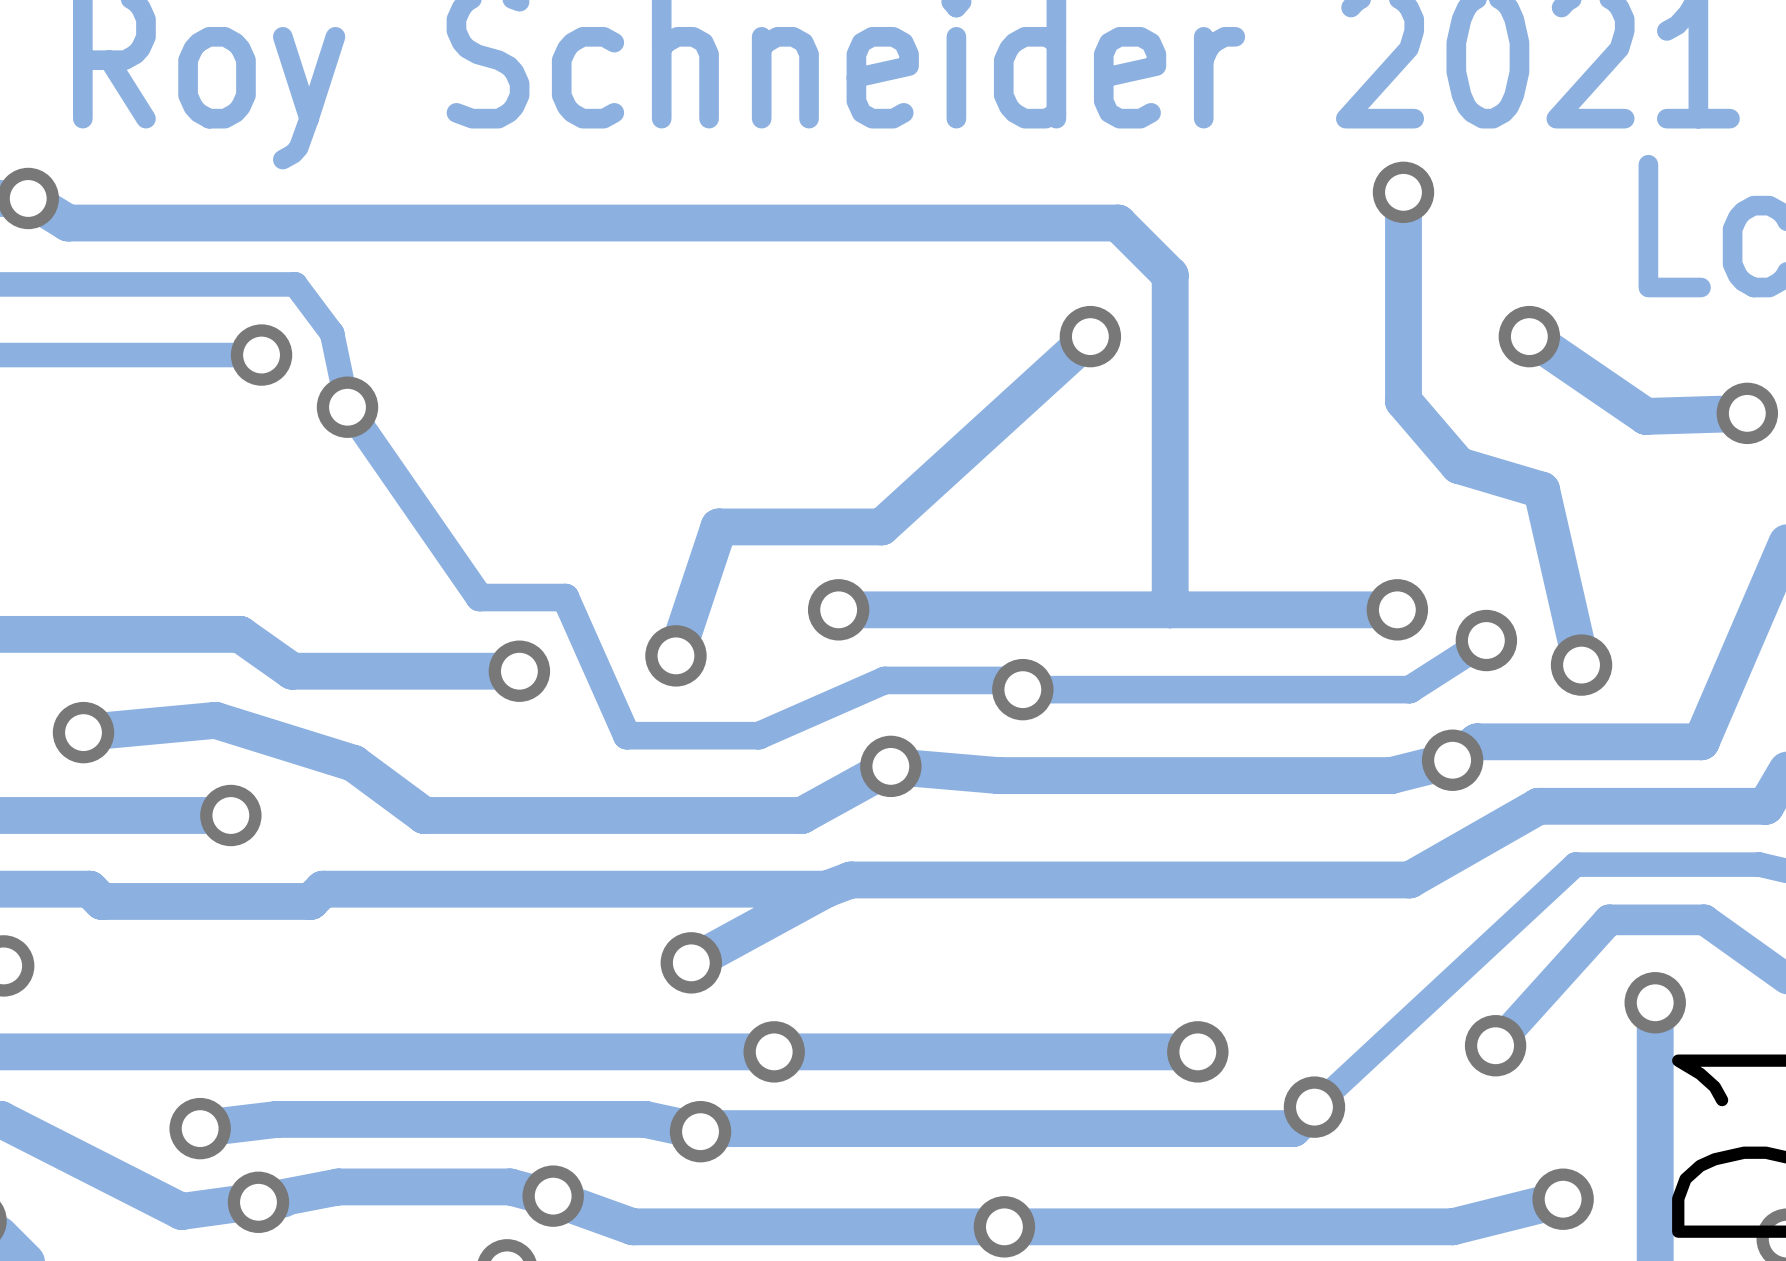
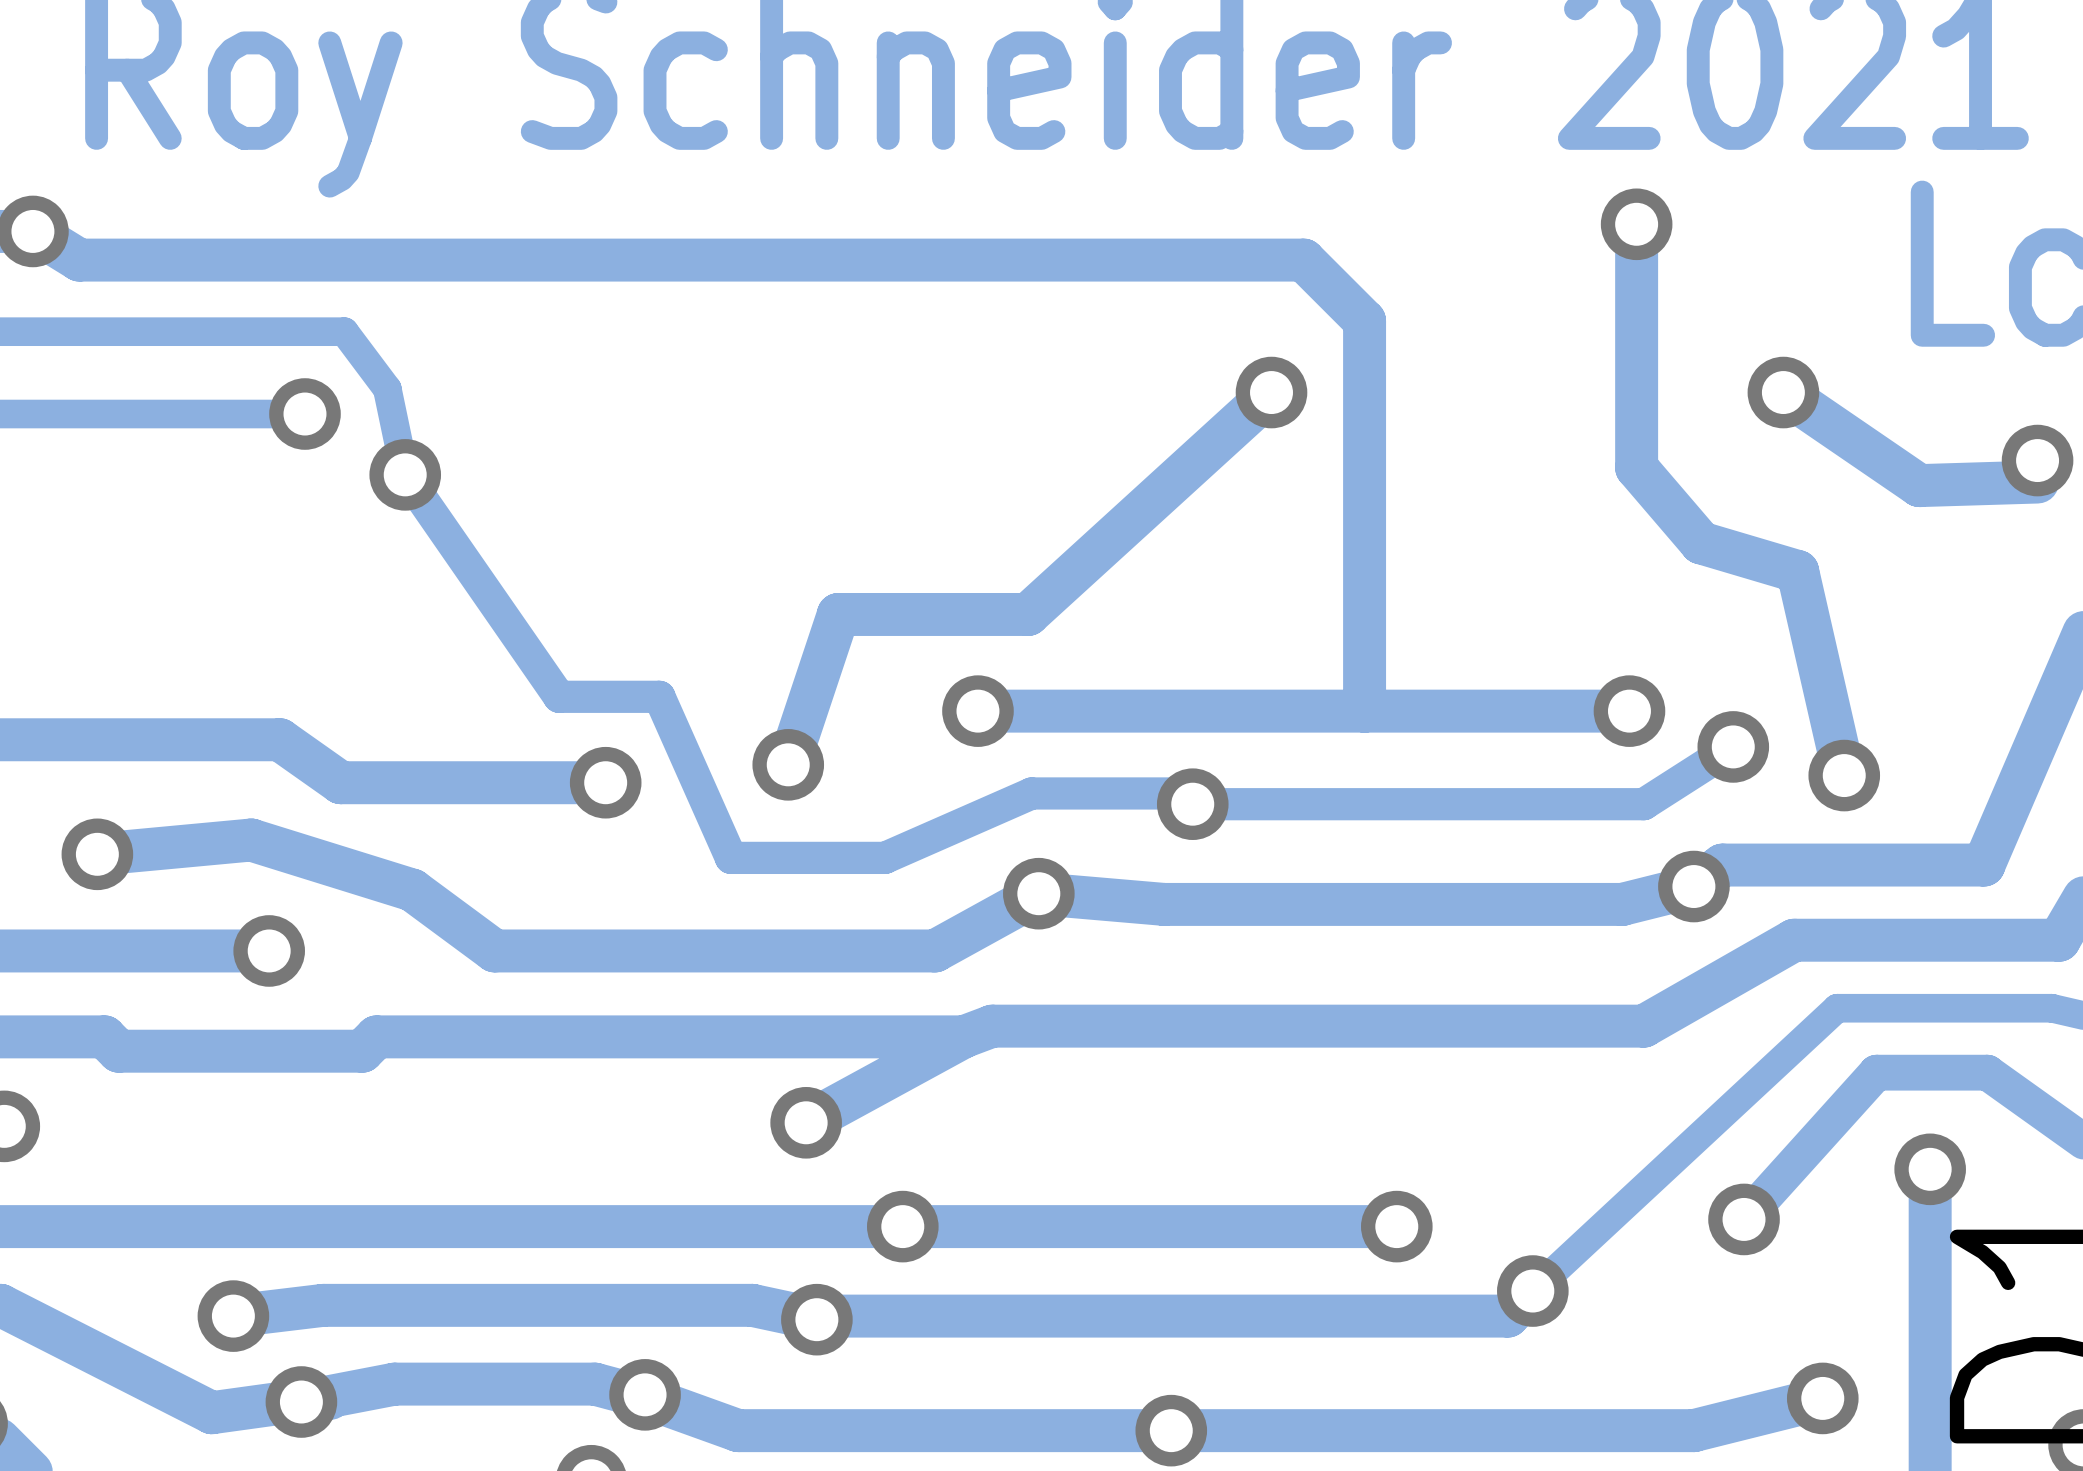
via position: (1747, 413) -> (2037, 460)

